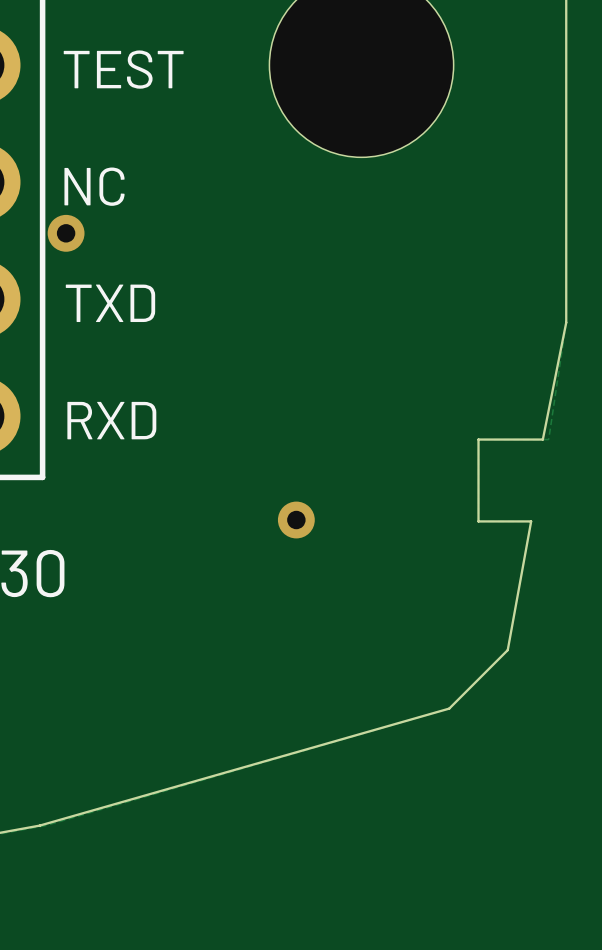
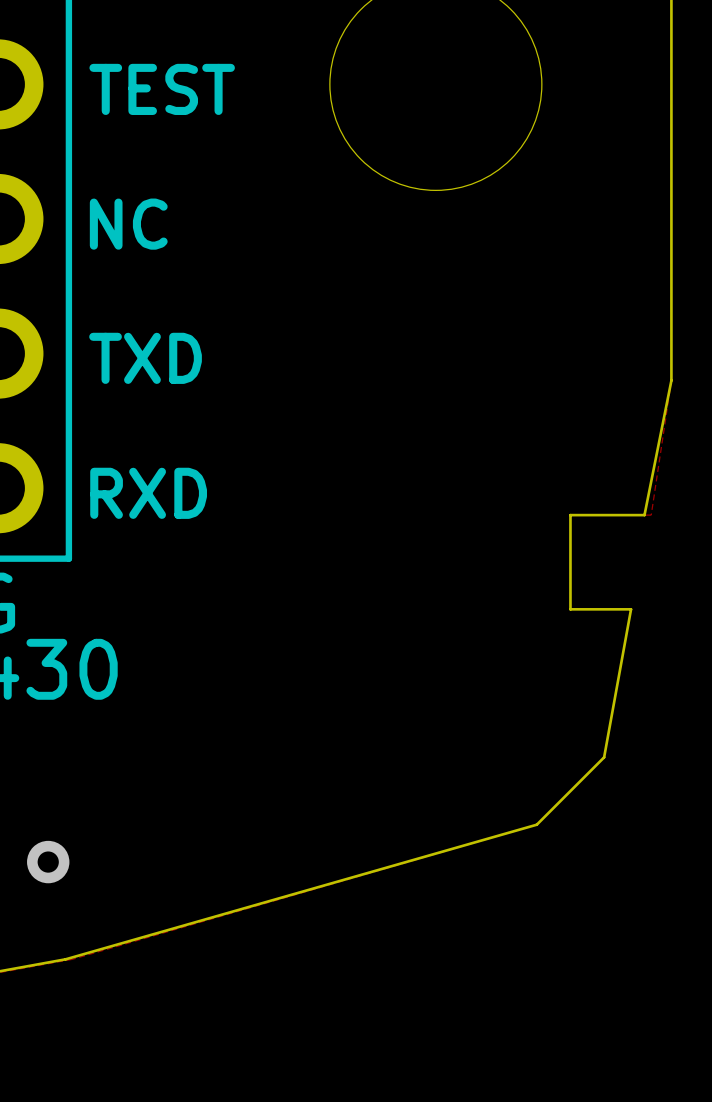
via: (66, 233) -> none
via: (296, 520) -> none
via: none -> (48, 862)

